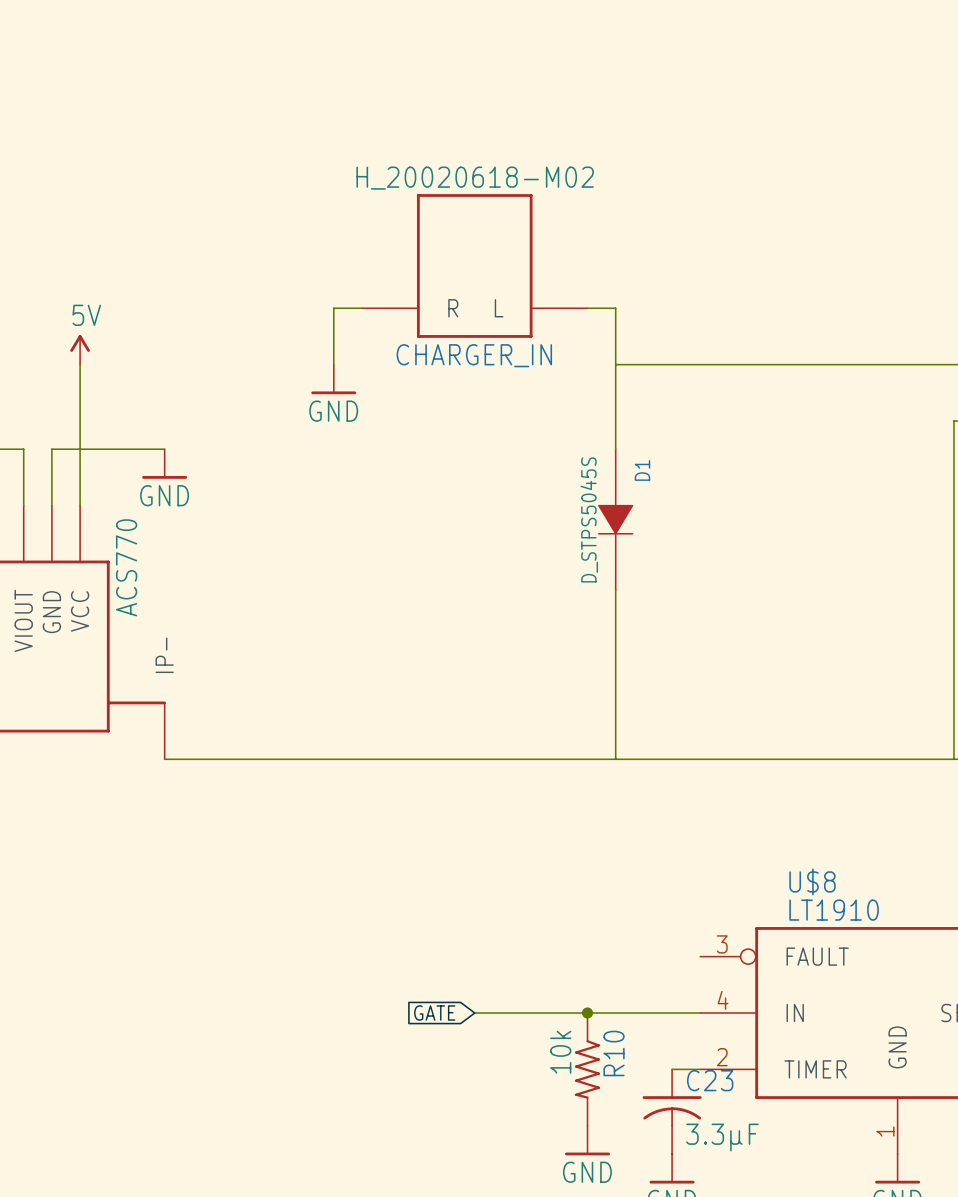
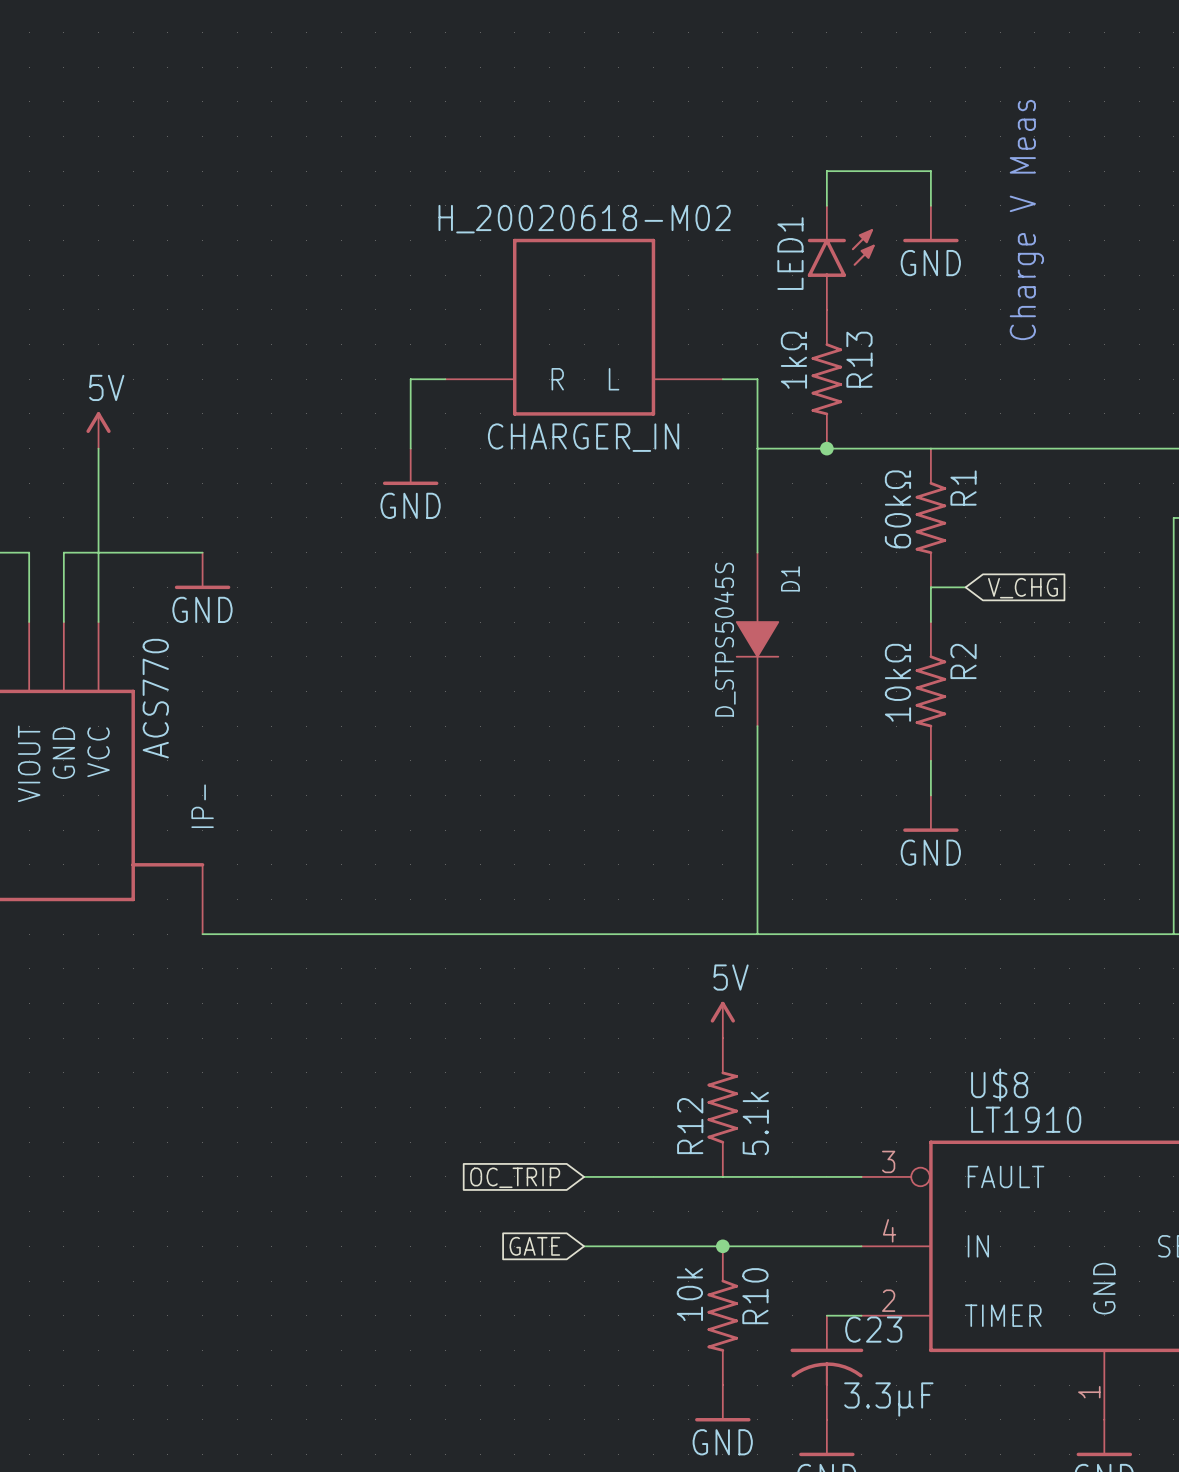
wire: none -> (826, 205) (826, 171) (930, 171) (930, 205)
text: none -> Charge V Meas (1026, 219)
power symbol: none -> GND (930, 224)
LED1: none -> (841, 257)
R13: none -> 1kΩ (826, 379)
junction: none -> (826, 448)
R1: none -> 60kΩ (930, 517)
wire: none -> (965, 587) (930, 587) (930, 622)
global label: none -> V_CHG (1023, 588)
R2: none -> 10kΩ (930, 691)
wire: none -> (930, 760) (930, 795)
power symbol: none -> GND (930, 813)
power symbol: none -> 5V (722, 1020)
R12: none -> 5.1k (722, 1107)
wire: none -> (584, 1176) (861, 1176)
global label: none -> OC_TRIP (515, 1177)

